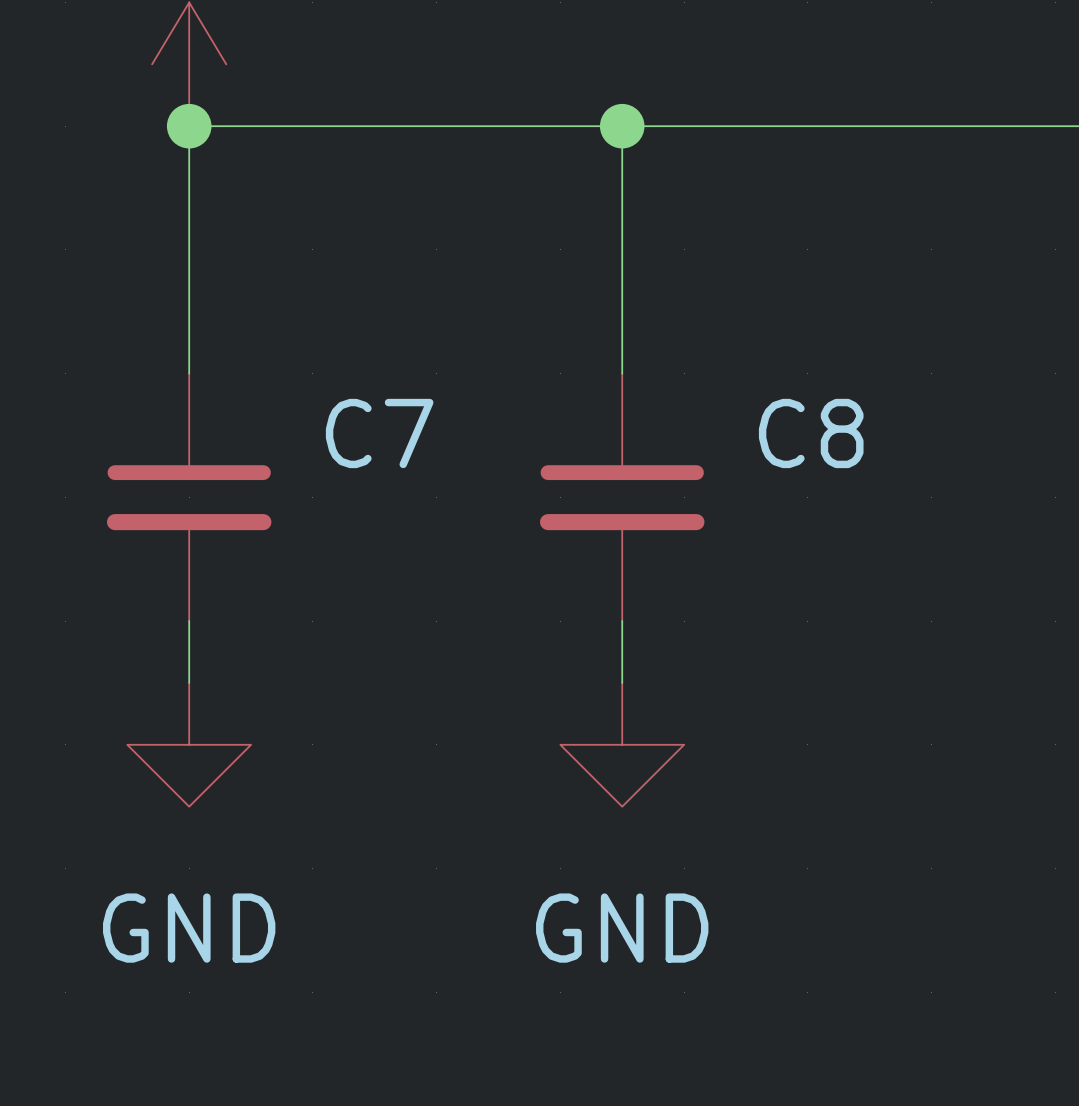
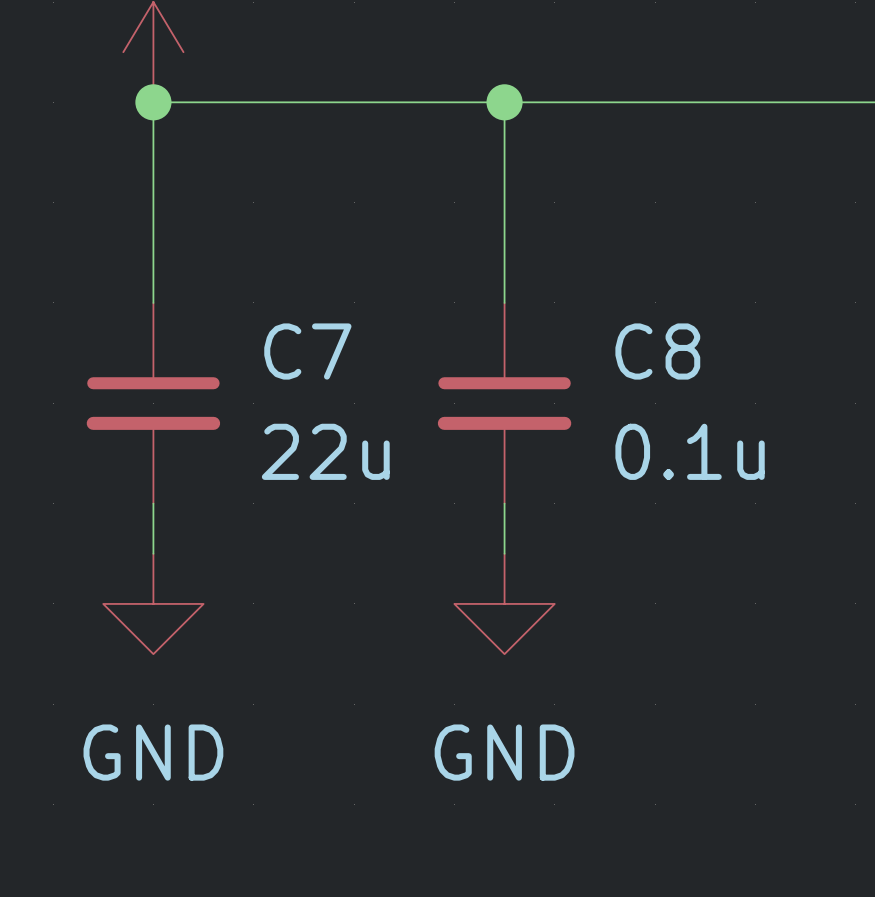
C7 value: none -> 22u (325, 451)
C8 value: none -> 0.1u (690, 451)

